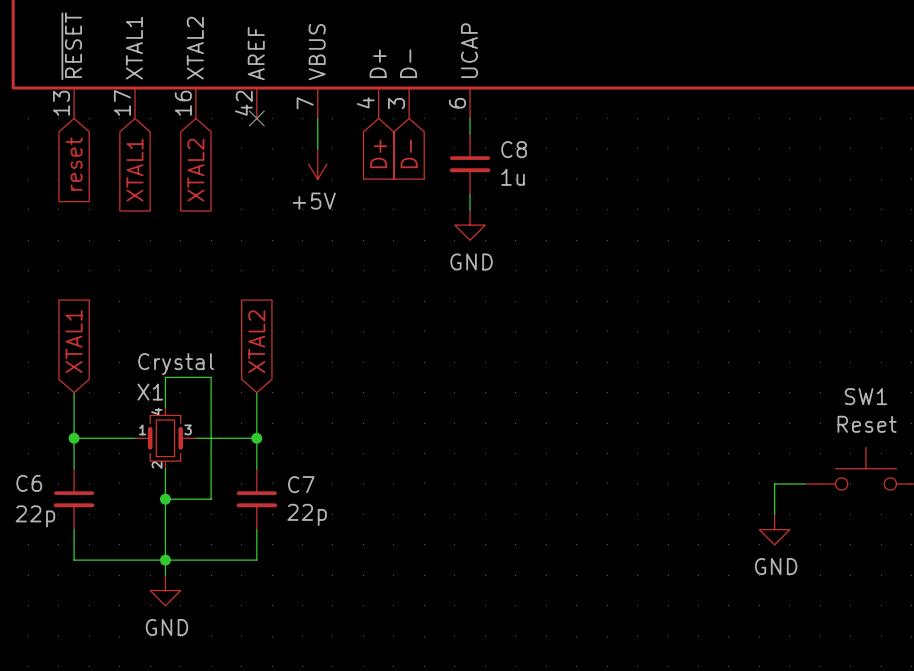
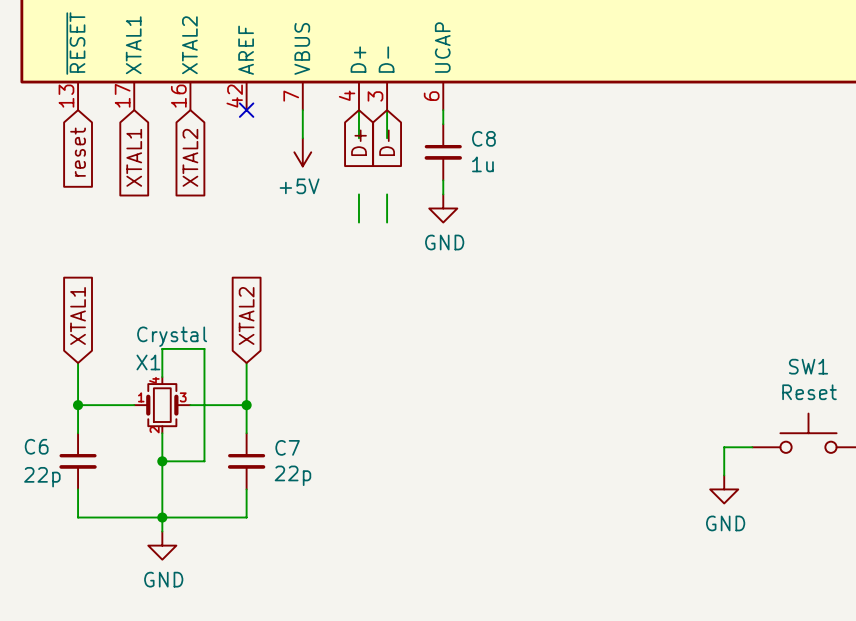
wire: none -> (358, 110) (358, 138)
wire: none -> (387, 110) (387, 138)
wire: none -> (358, 194) (358, 222)
wire: none -> (387, 194) (387, 222)

